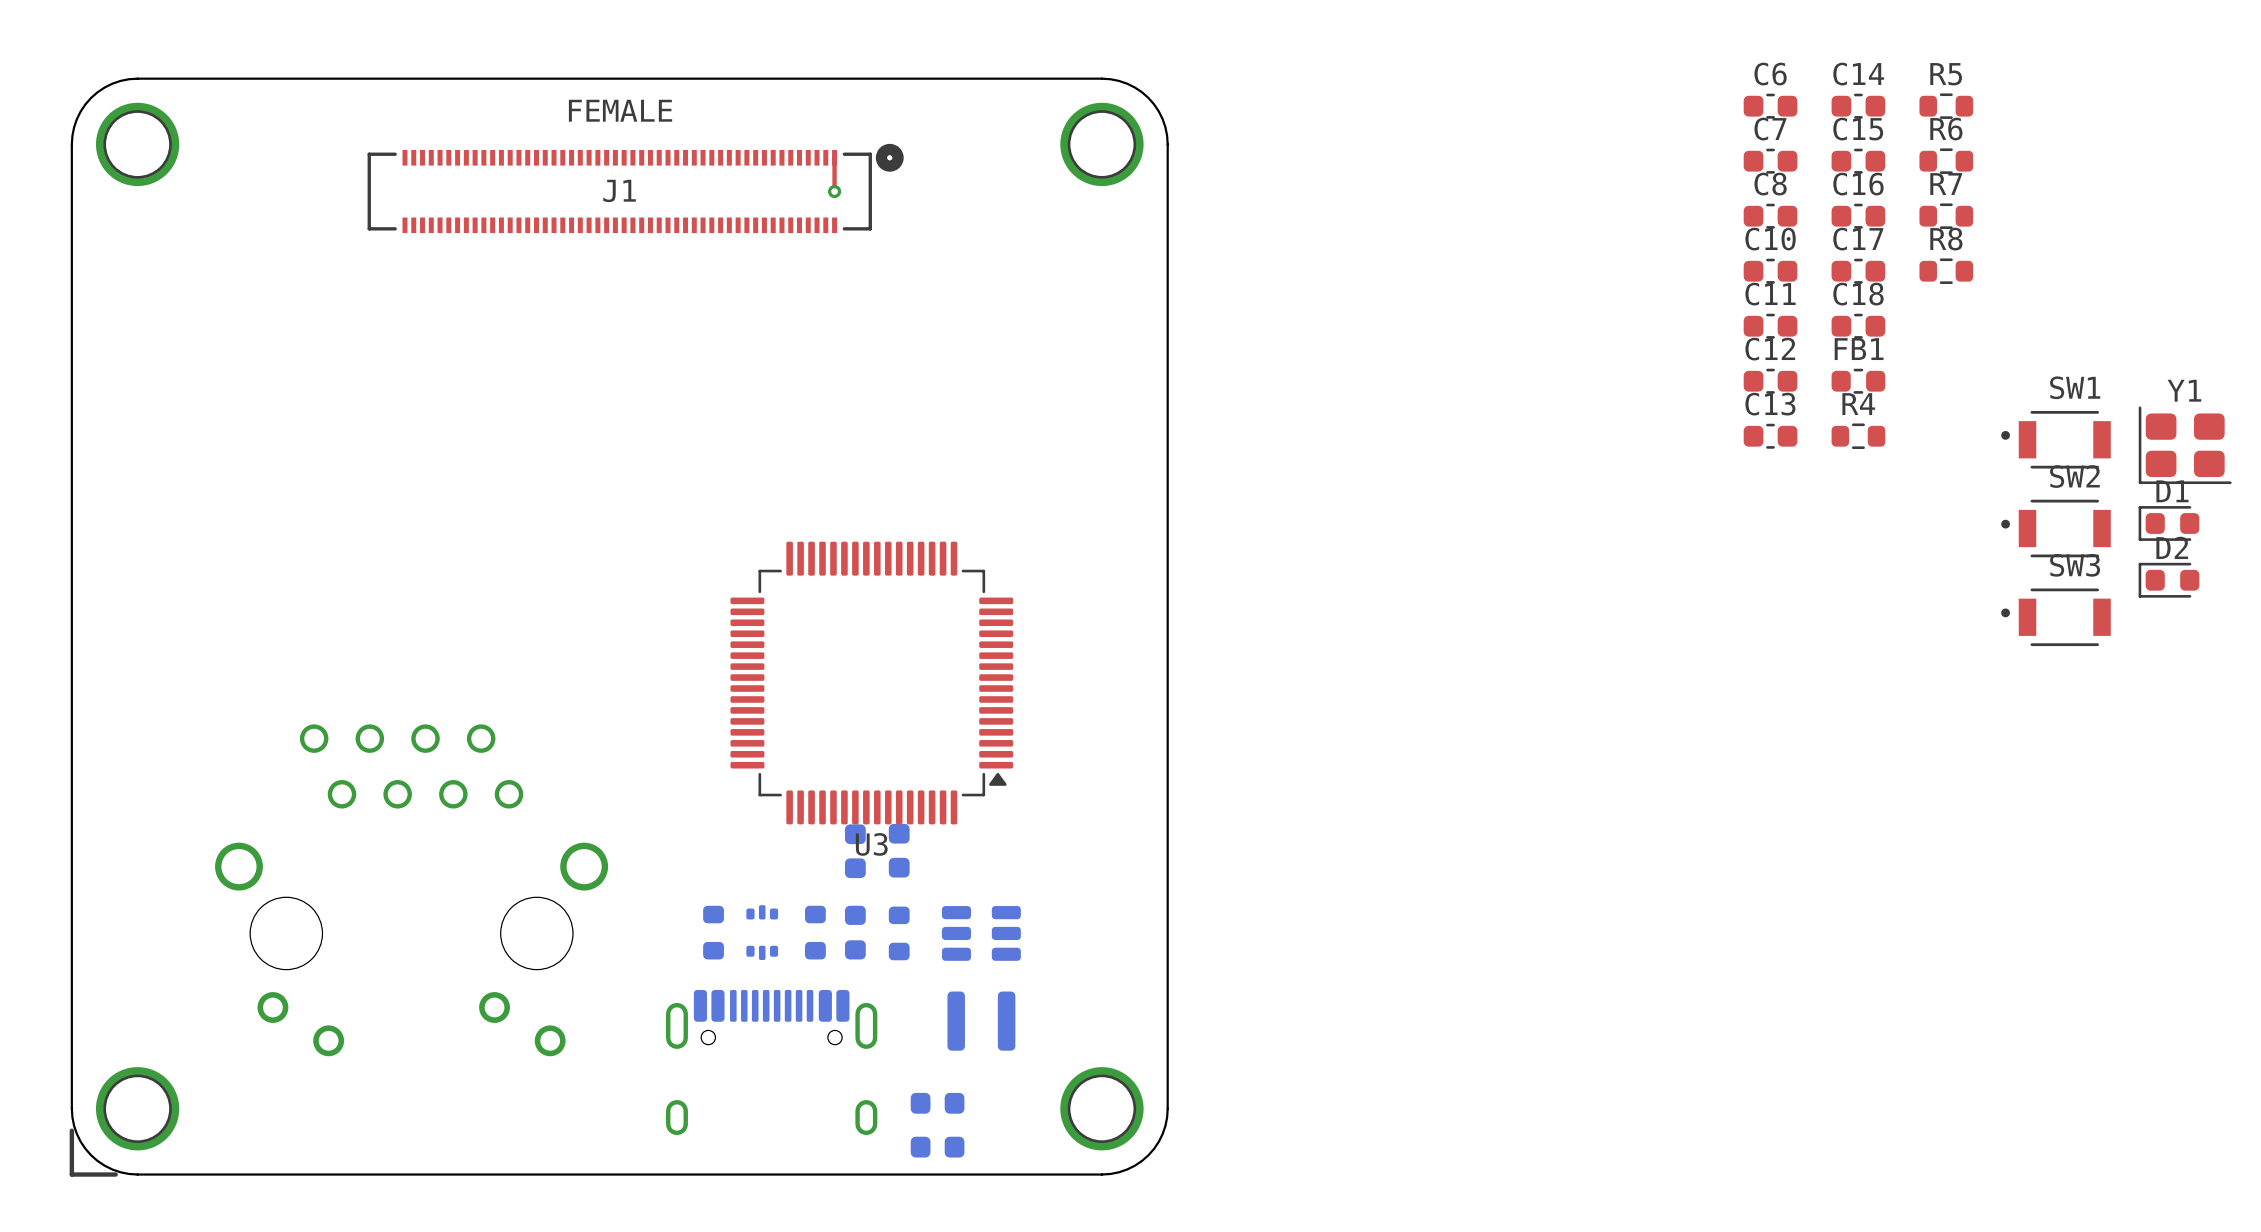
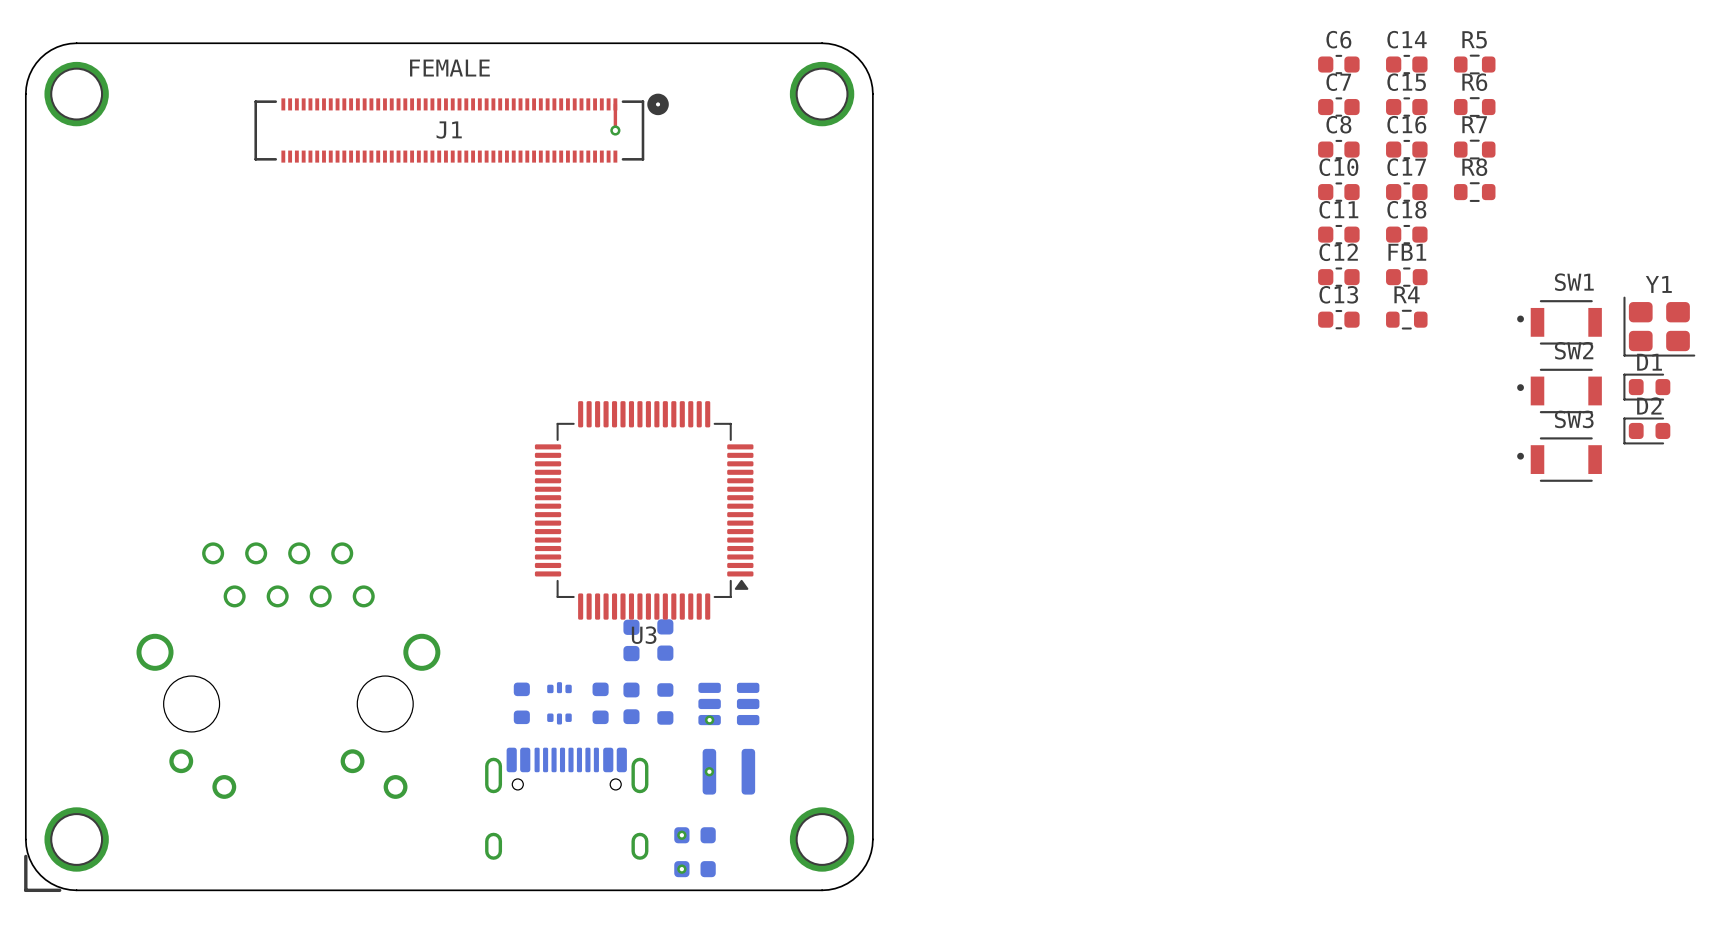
via: none -> (709, 720)
via: none -> (709, 771)
via: none -> (681, 835)
via: none -> (681, 869)

